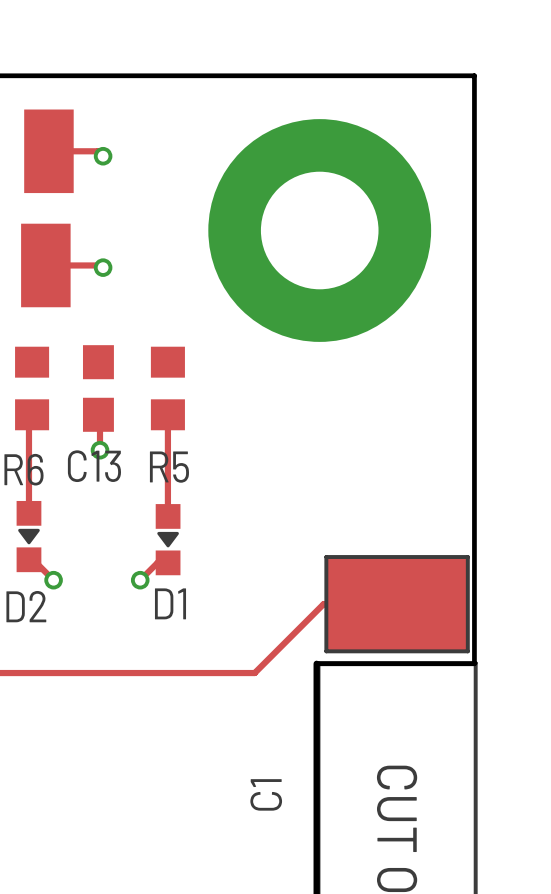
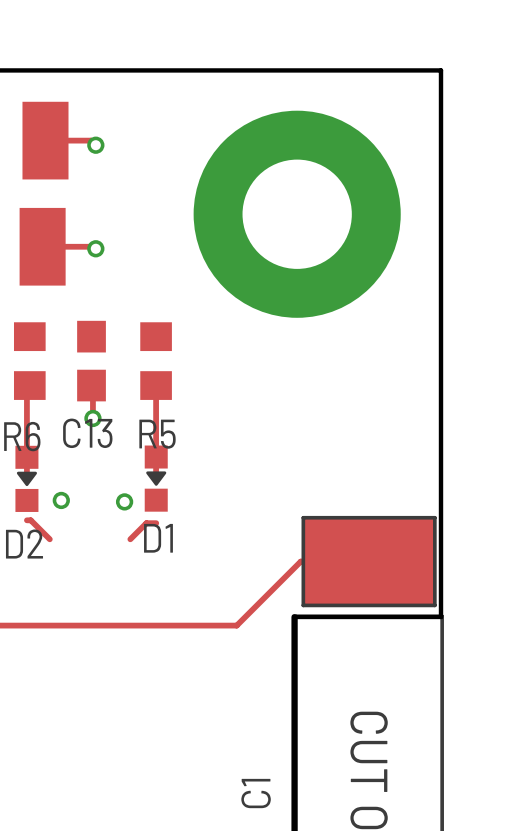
D2 position: (28, 536) -> (26, 478)
via: none -> (61, 500)
D1 position: (168, 539) -> (156, 478)
via: (53, 580) -> none
via position: (140, 580) -> (124, 501)
C1 name position: C1 (266, 794) -> C1 (256, 793)

